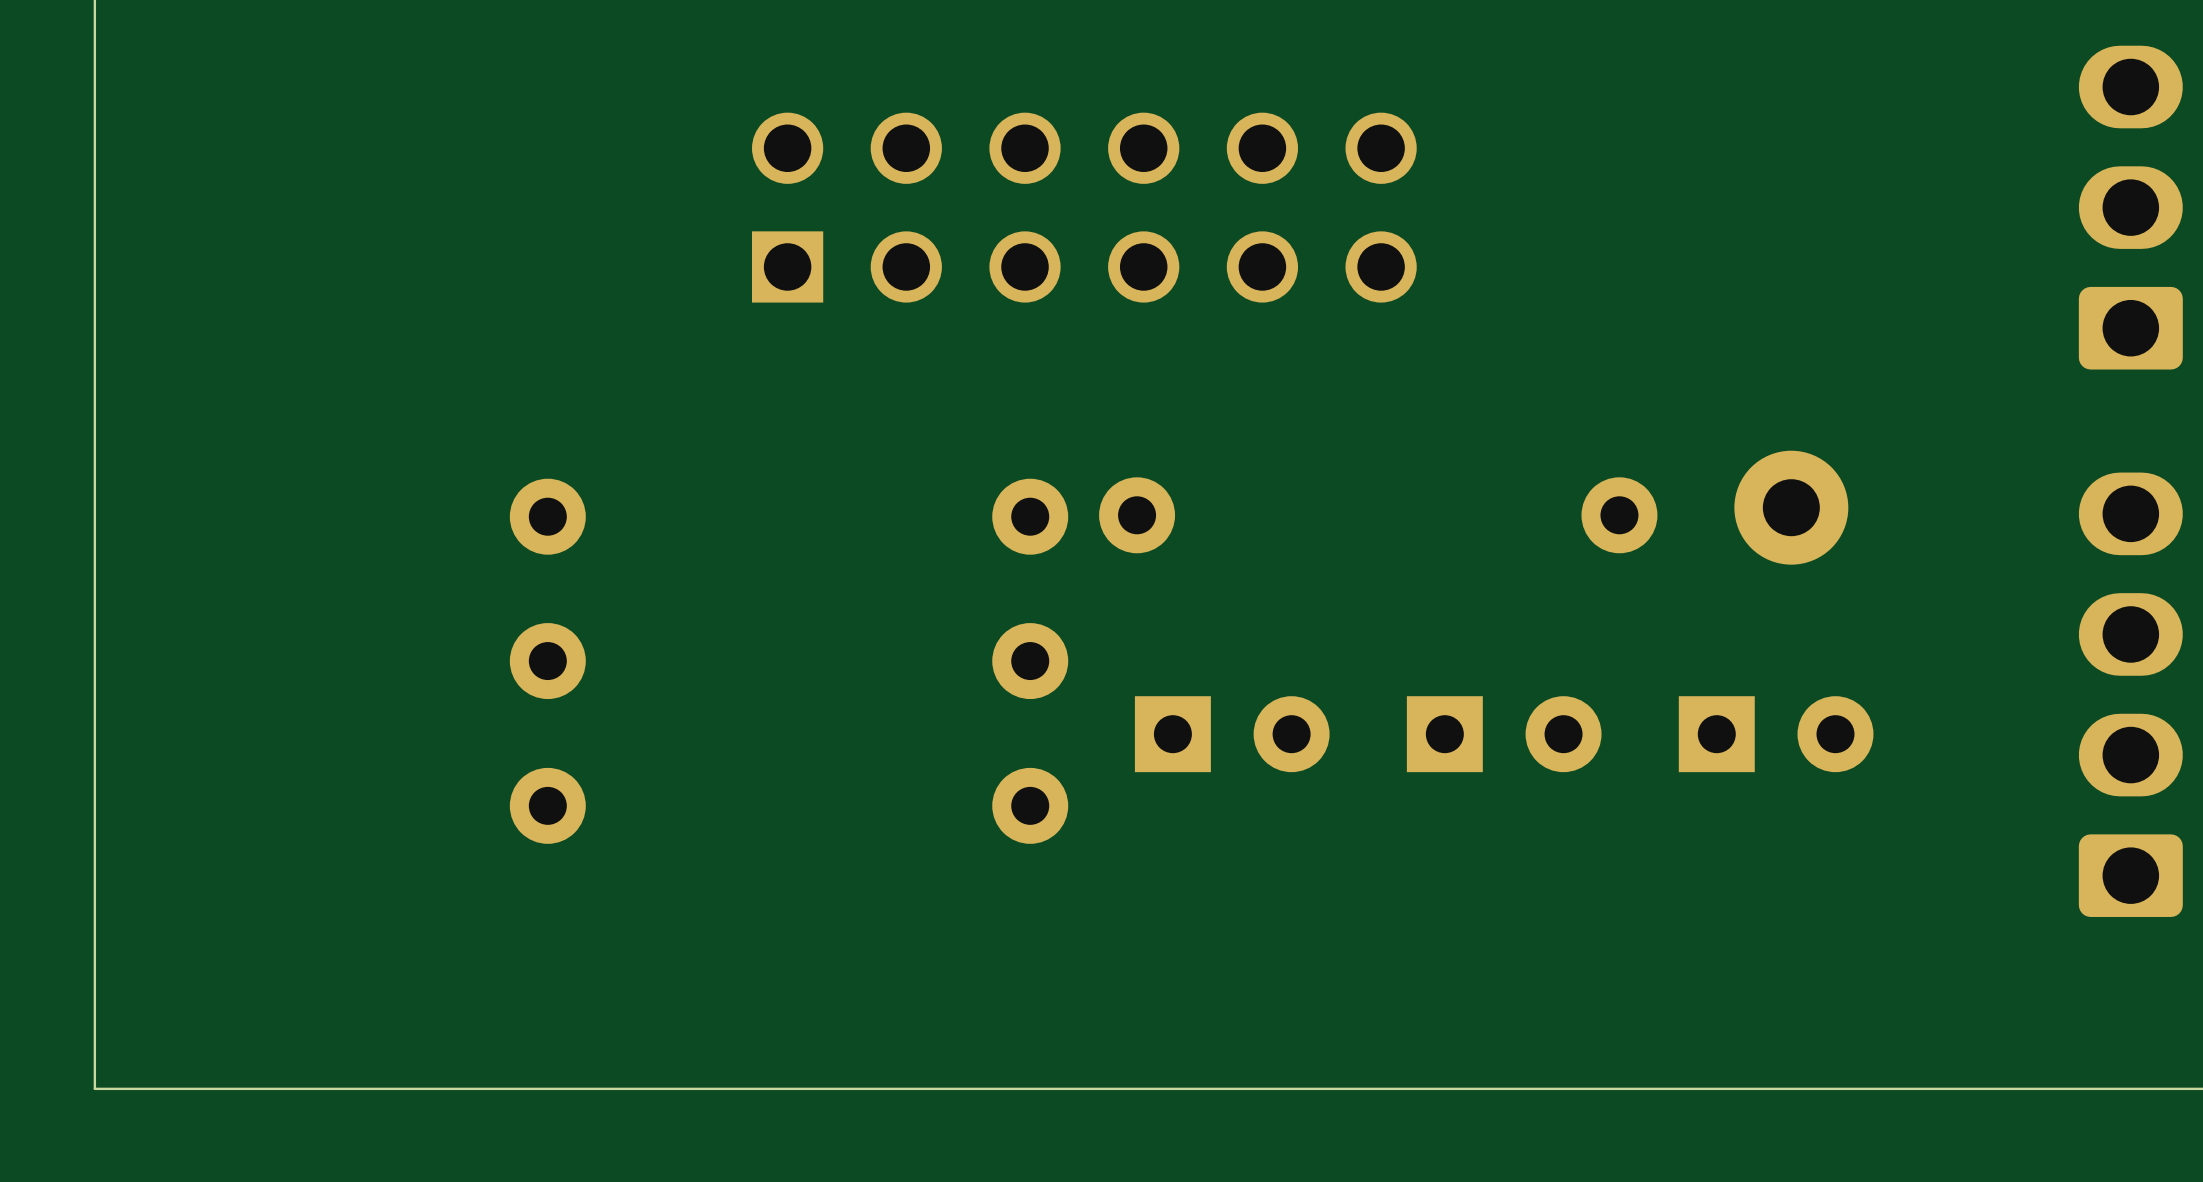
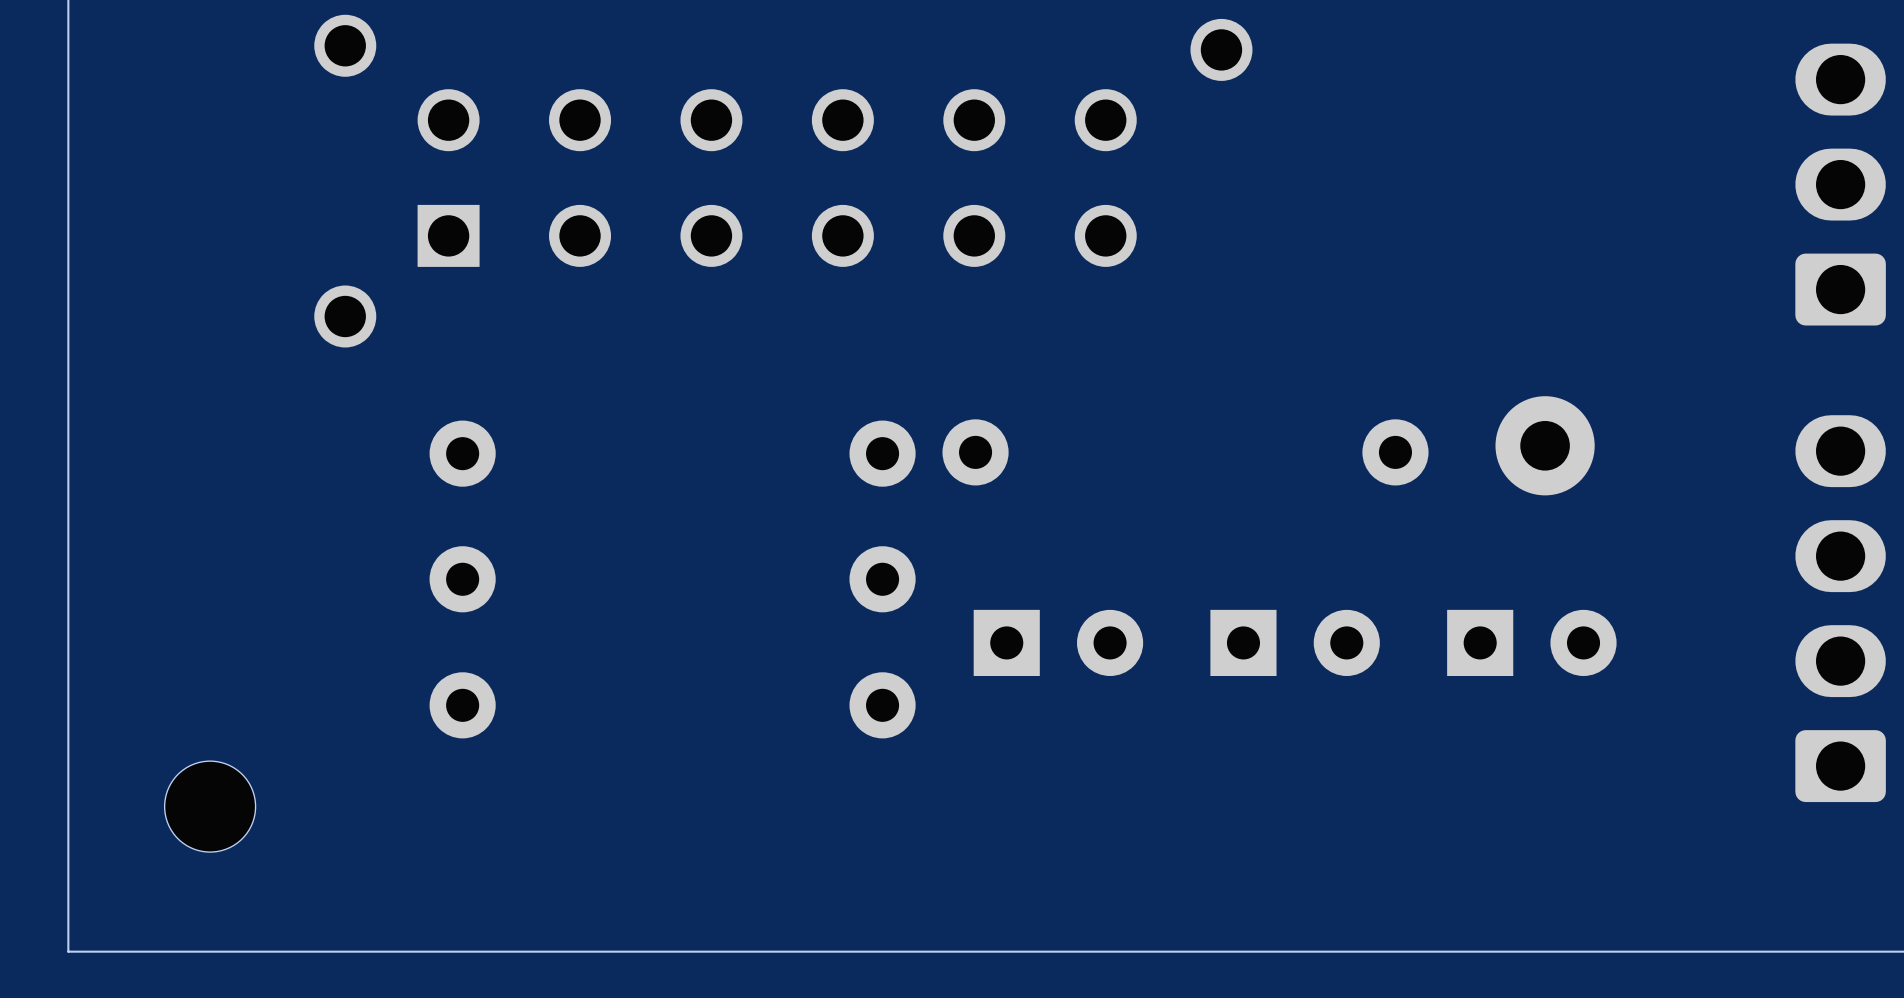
part: none -> (783, 181)
part: (1084, 207) -> none
part: none -> (210, 806)

